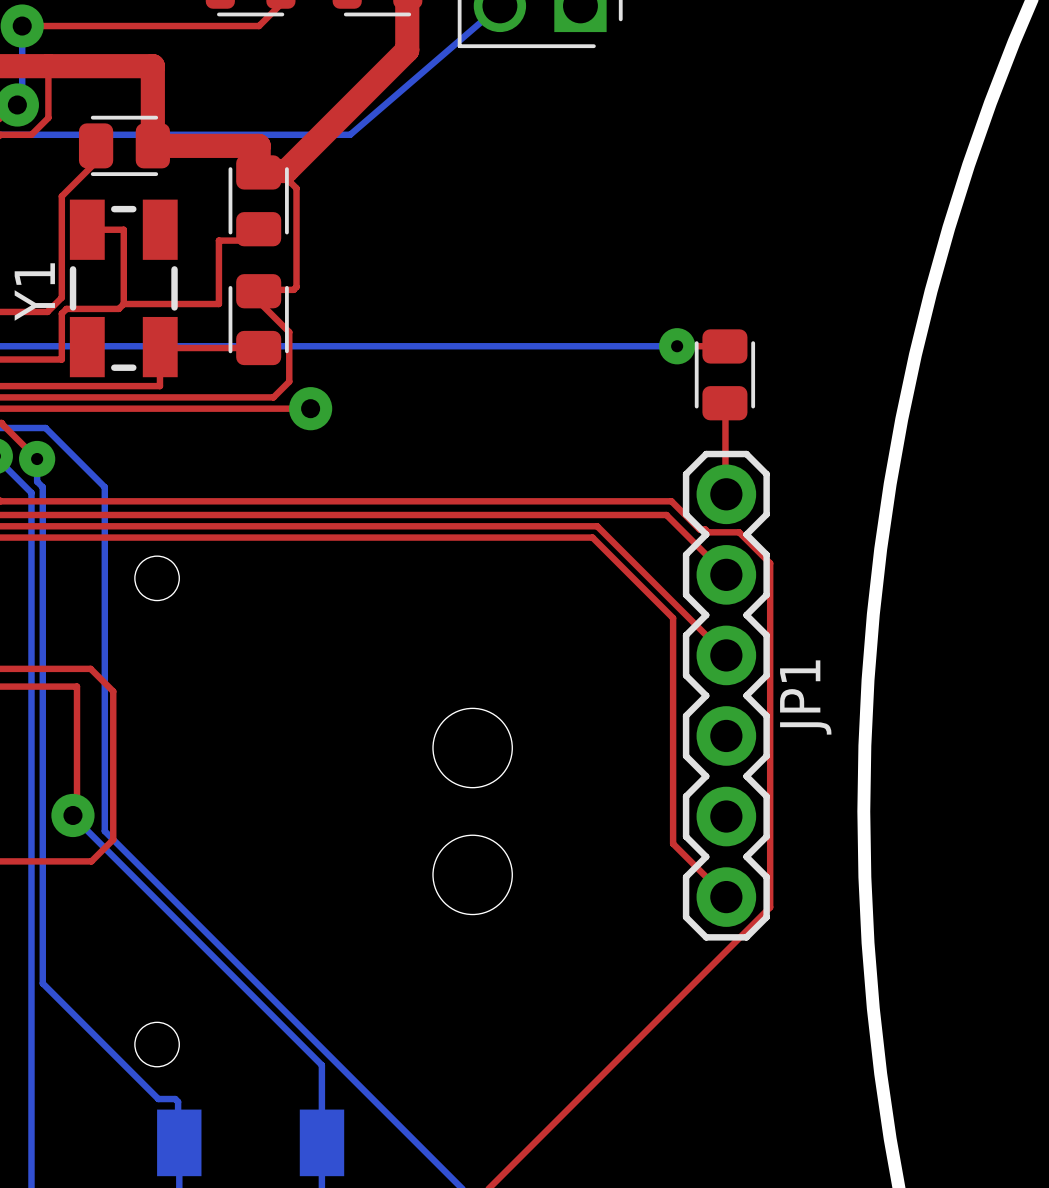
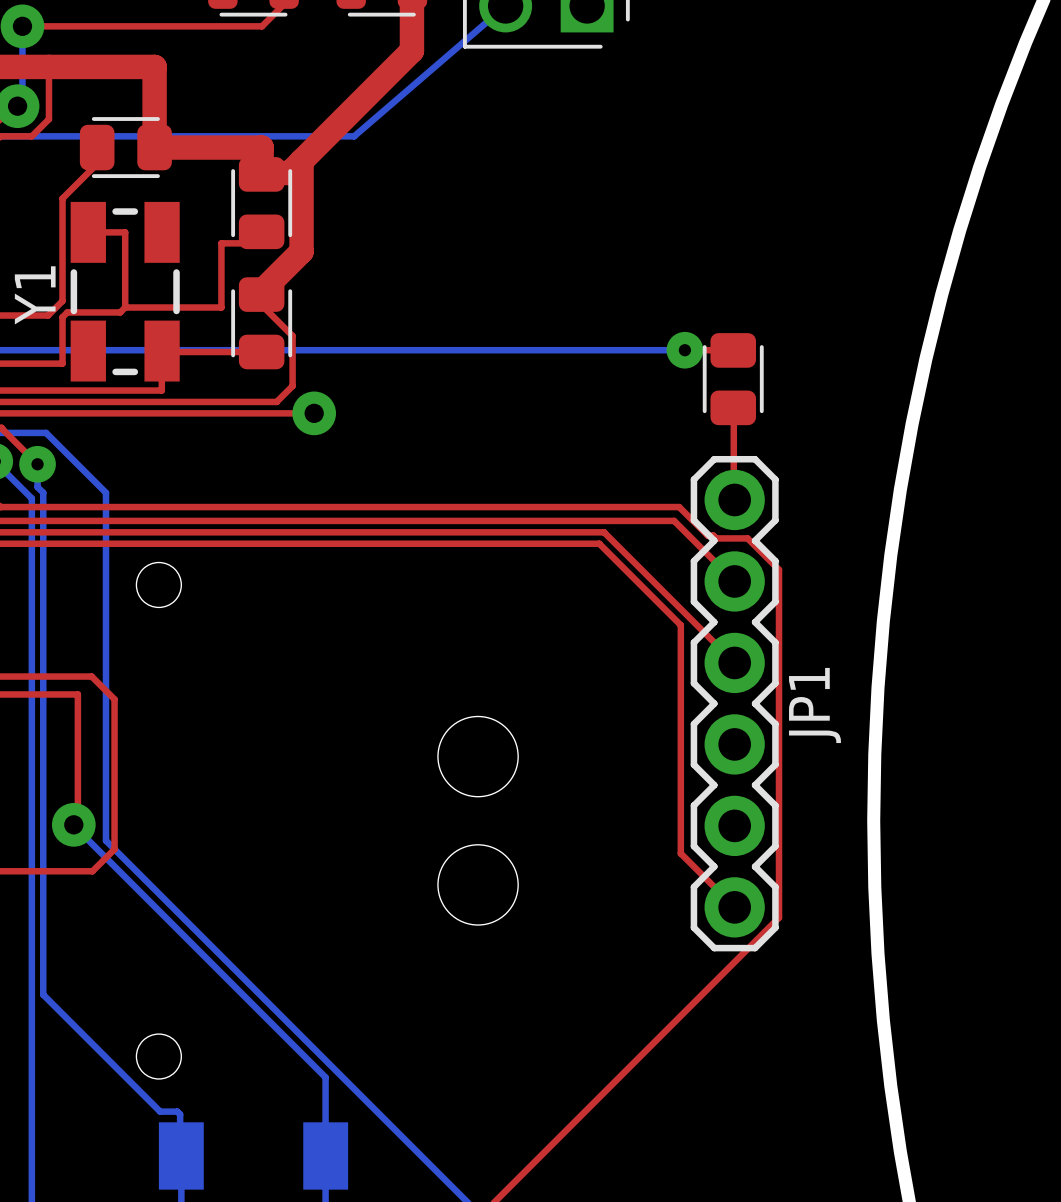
top track: none -> (301, 161) (301, 251) (261, 291) (261, 294)
top track: (286, 171) (290, 182) (296, 188) (296, 287) (293, 289) (259, 289) -> none

